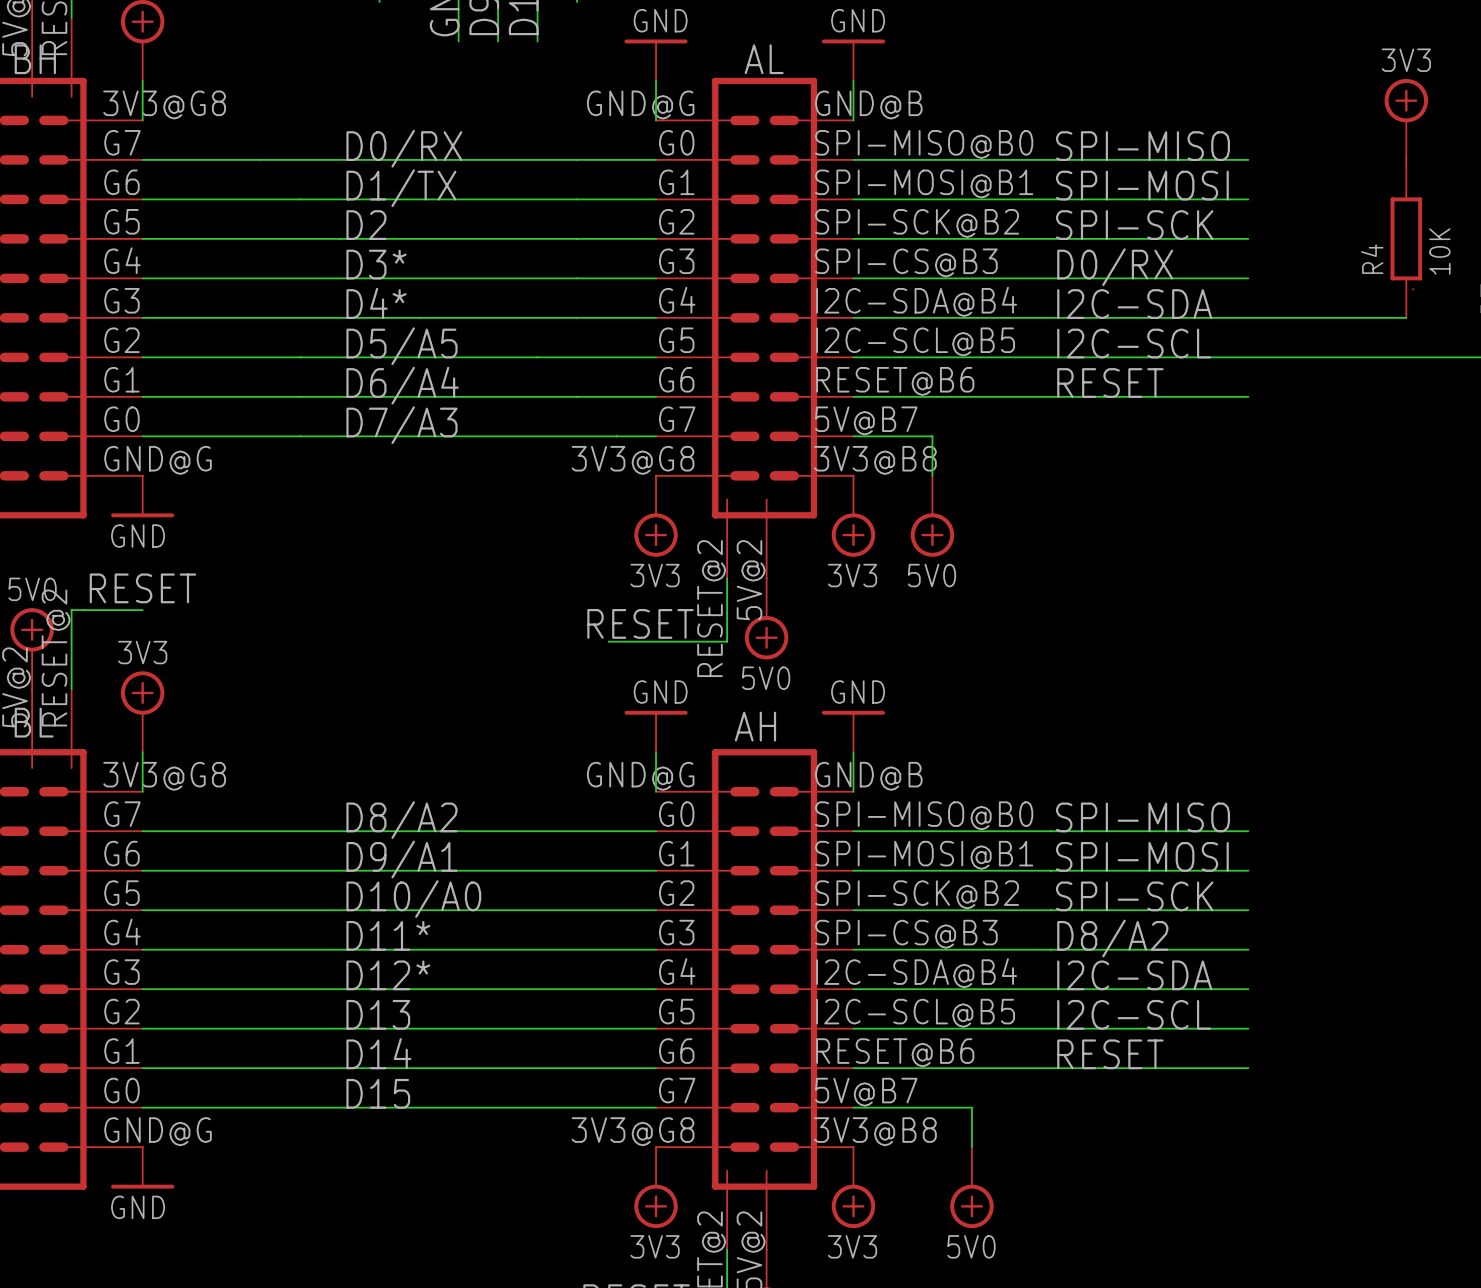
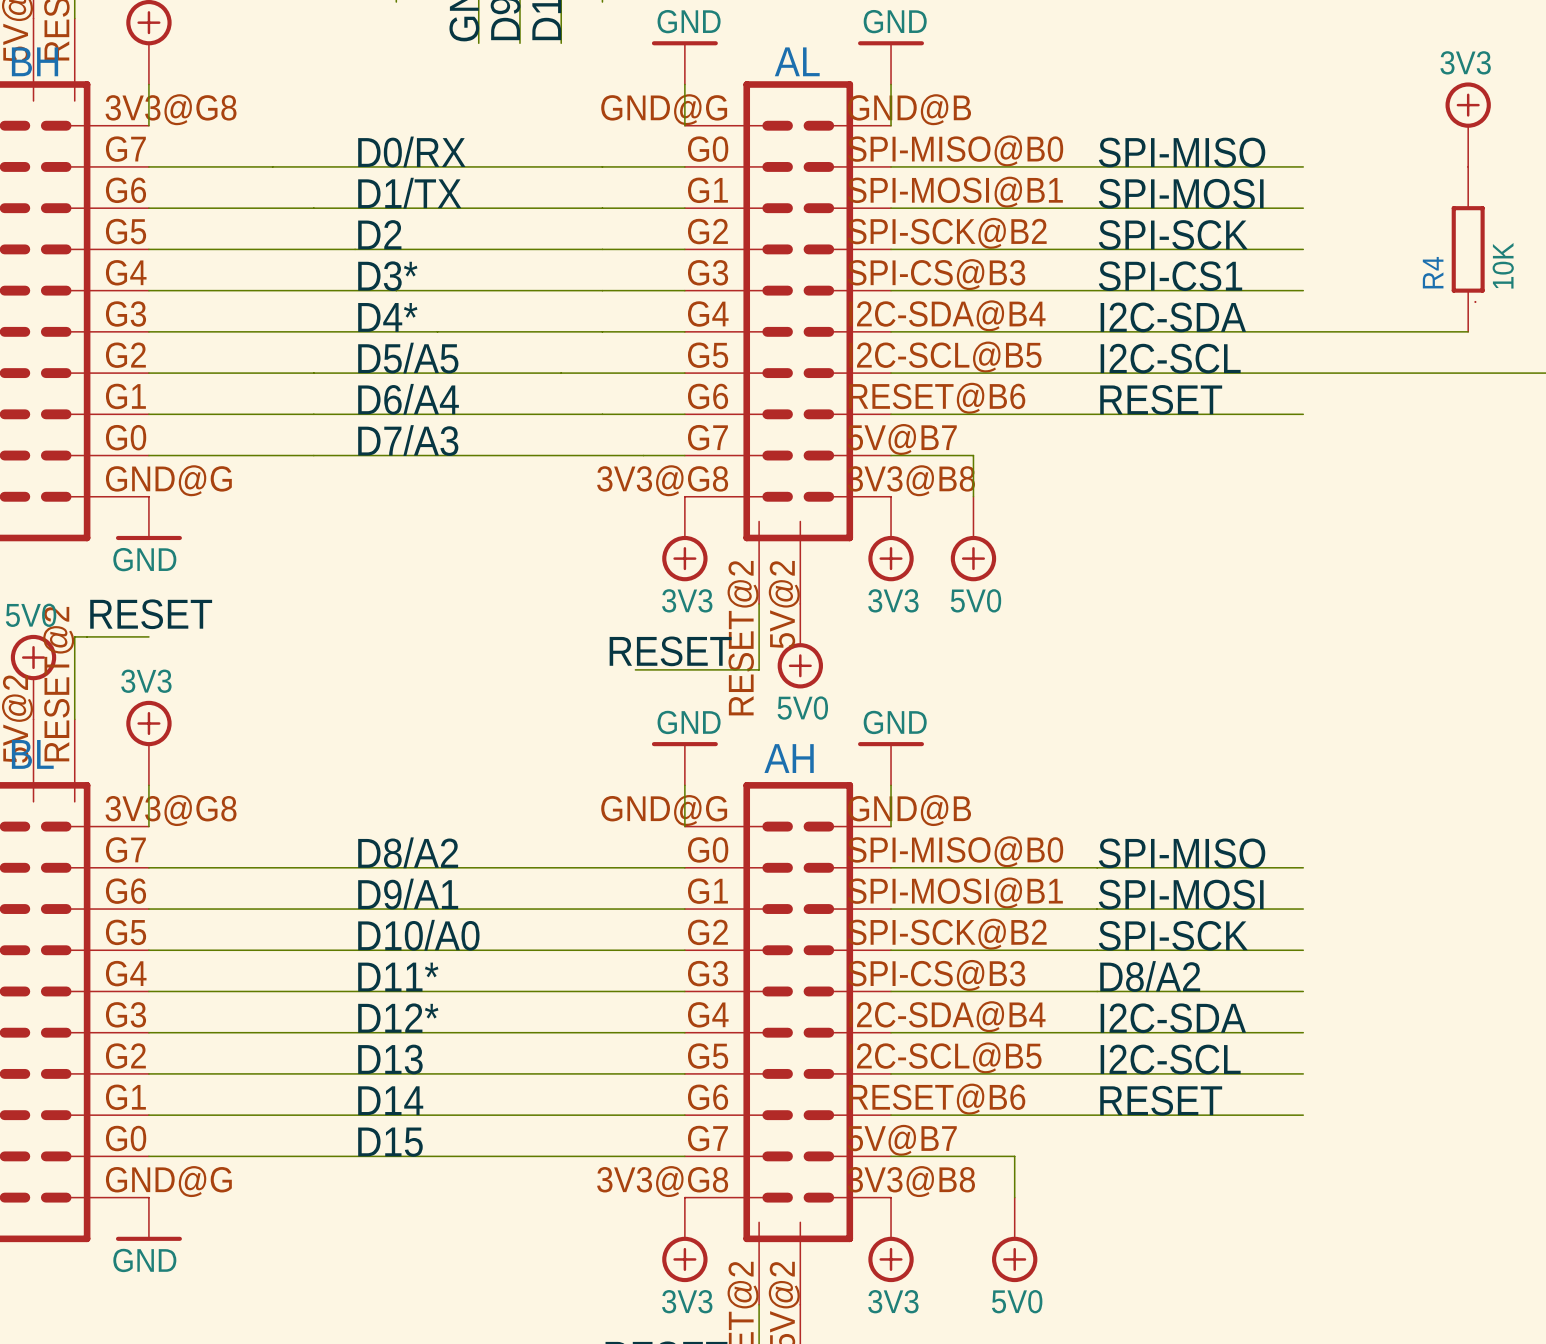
label: D0/RX (1115, 267) -> SPI-CS1 (1170, 276)

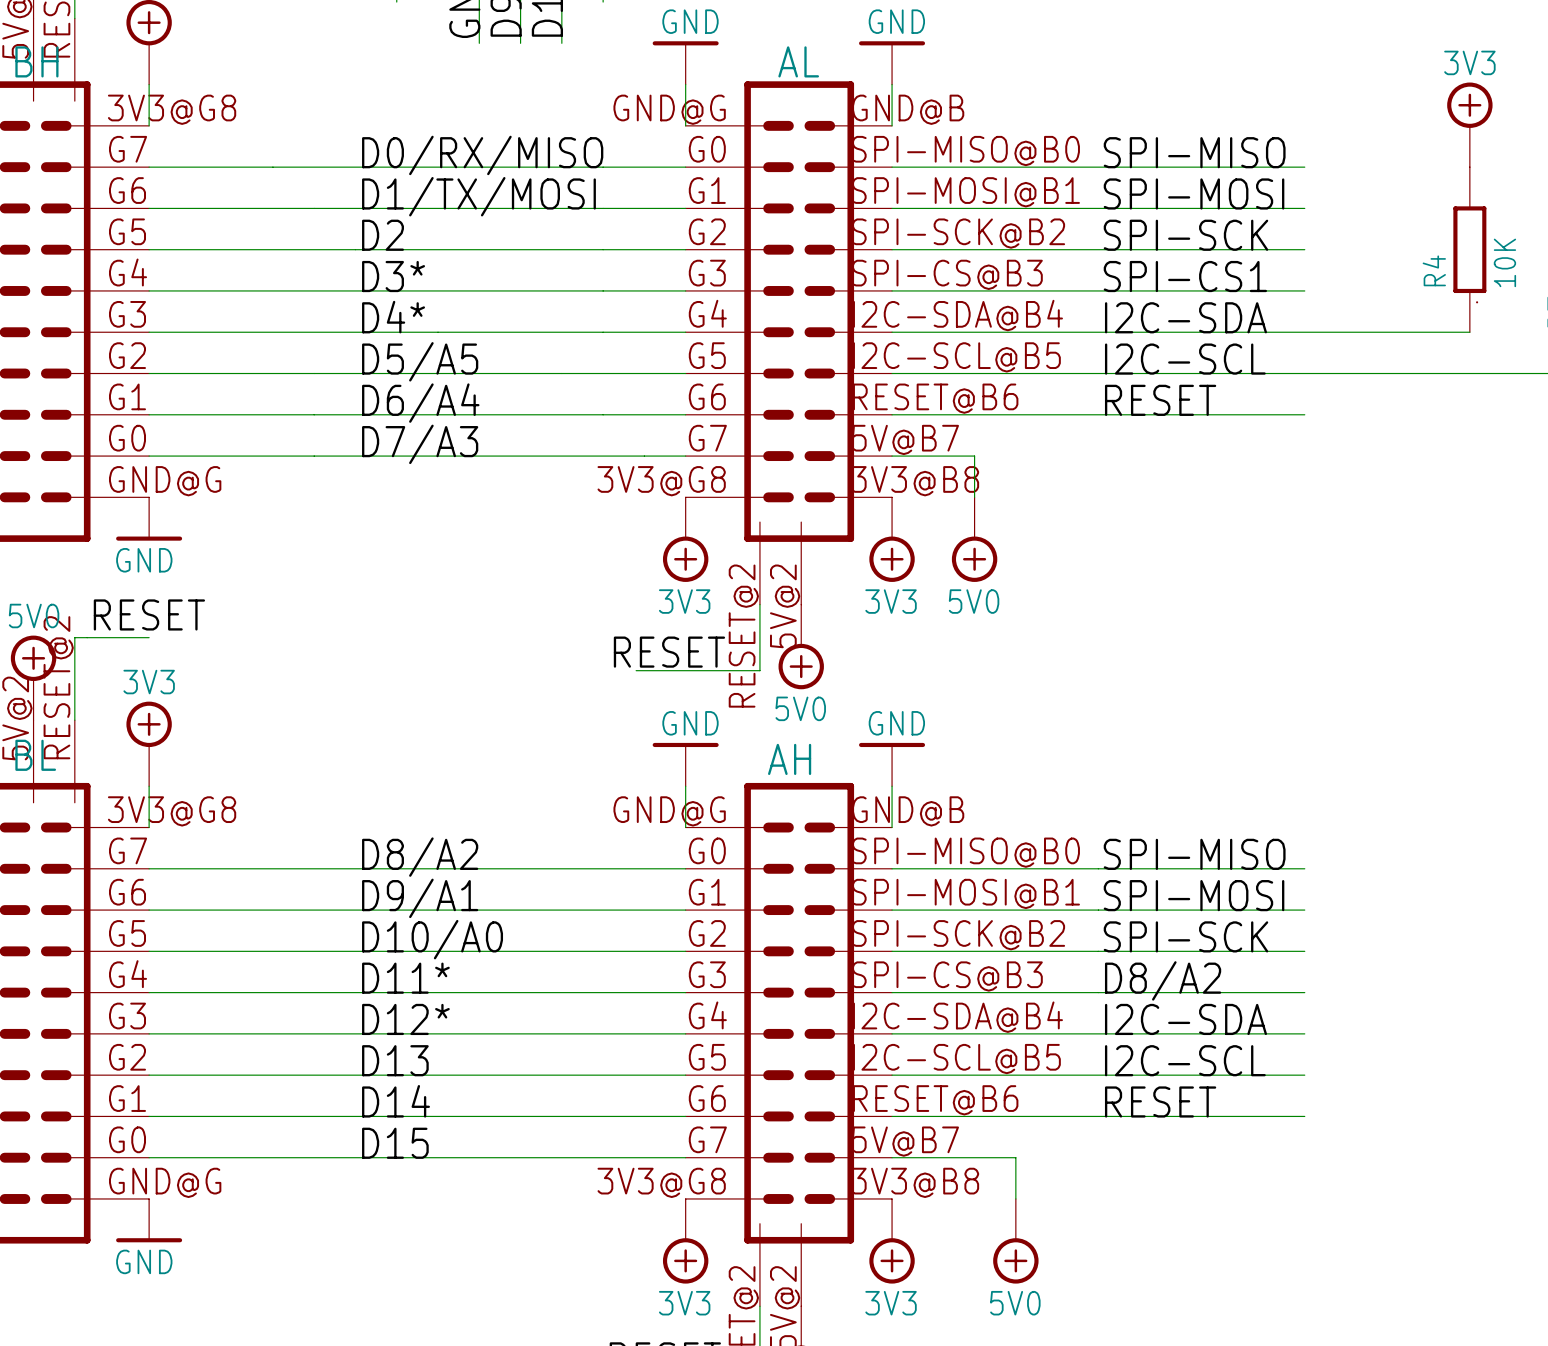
label: D0/RX (411, 151) -> D0/RX/MISO (482, 155)
label: D1/TX (409, 193) -> D1/TX/MOSI (478, 196)

